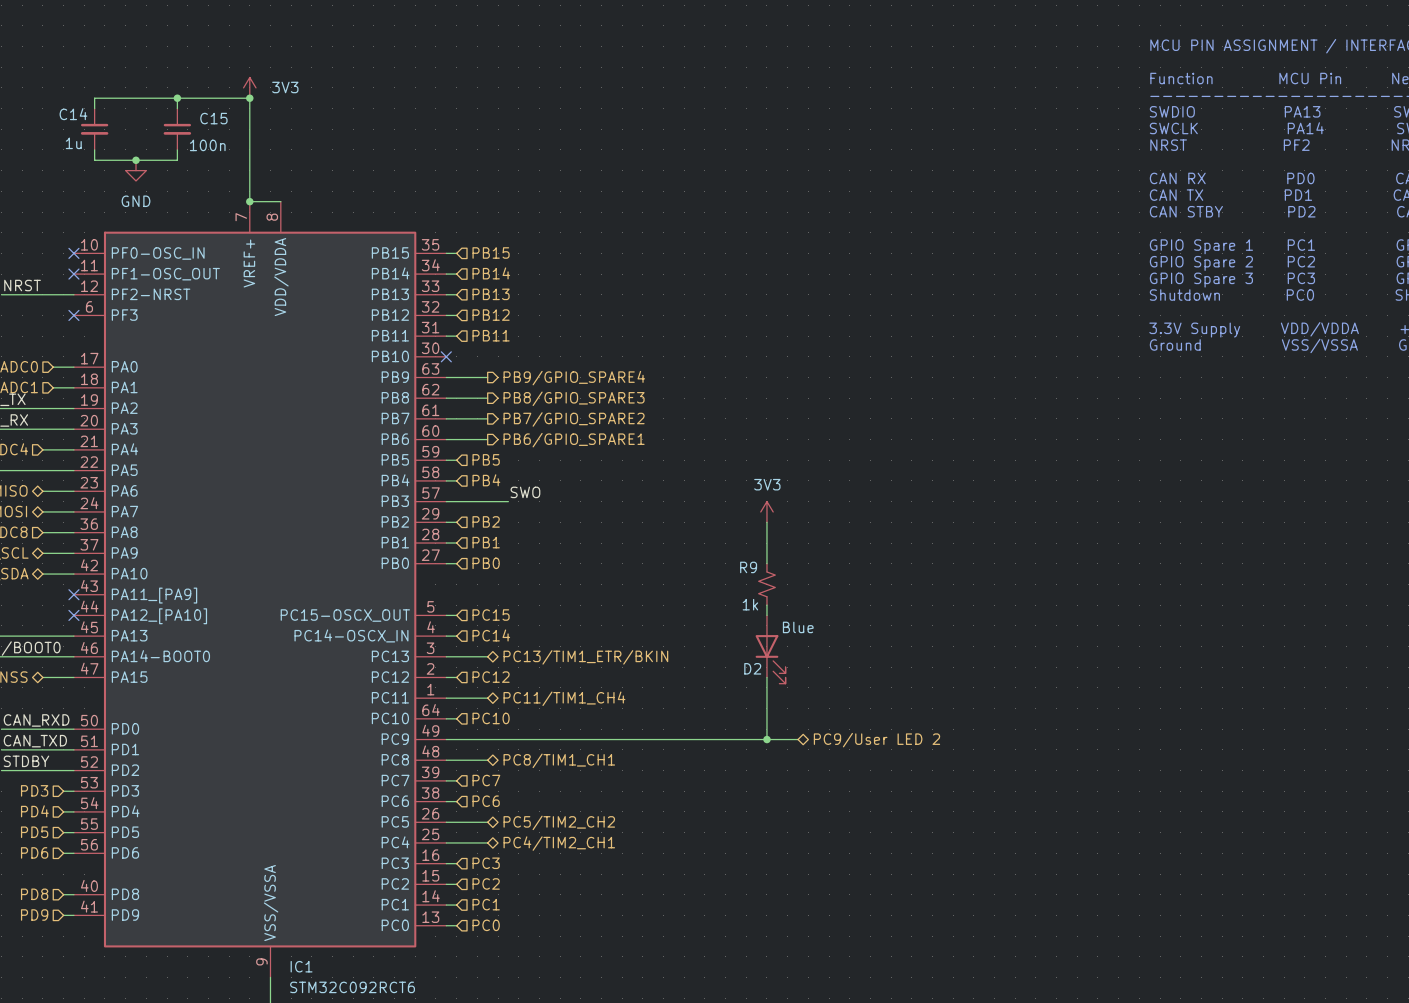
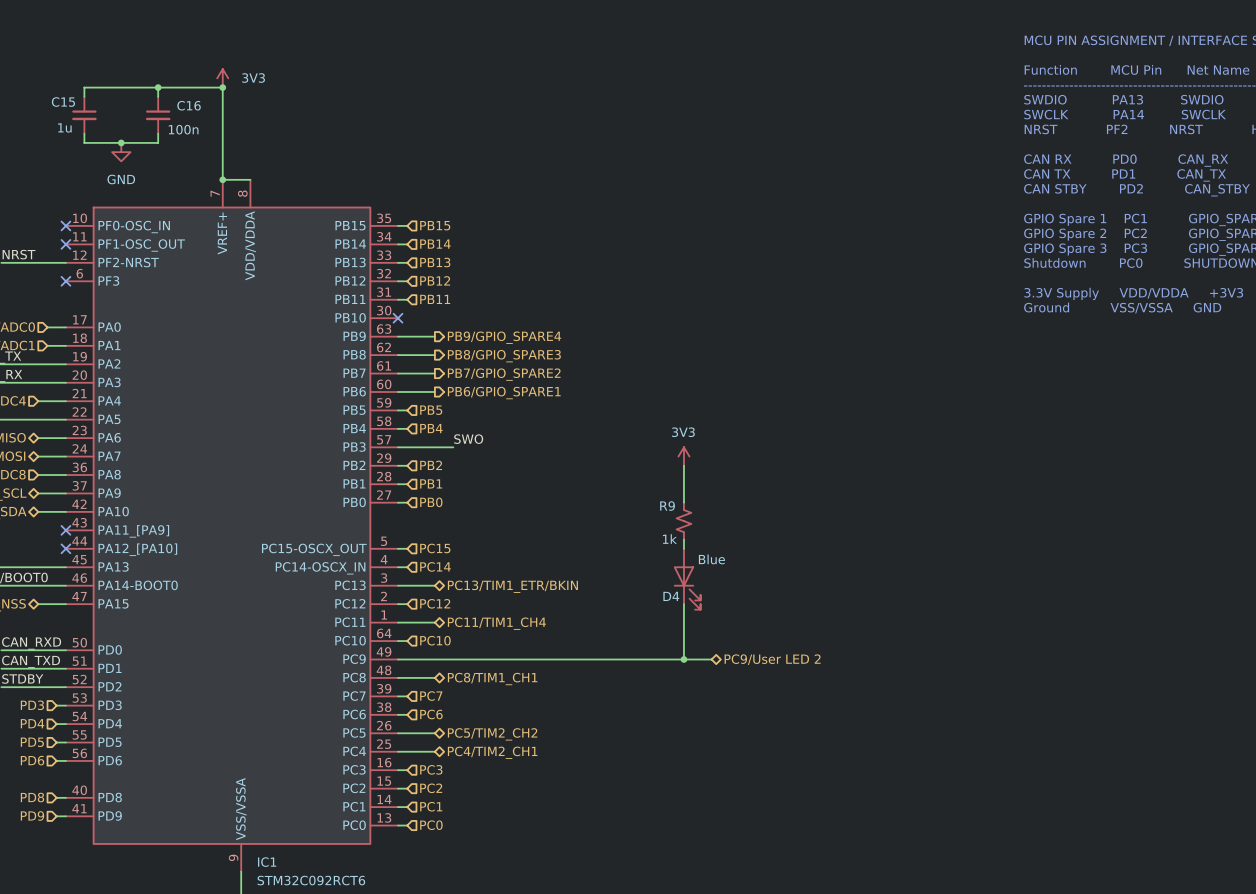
C14 name: C14 (73, 114) -> C15 (63, 102)
C15 name: C15 (213, 118) -> C16 (189, 105)
D2 name: D2 (752, 668) -> D4 (671, 596)

